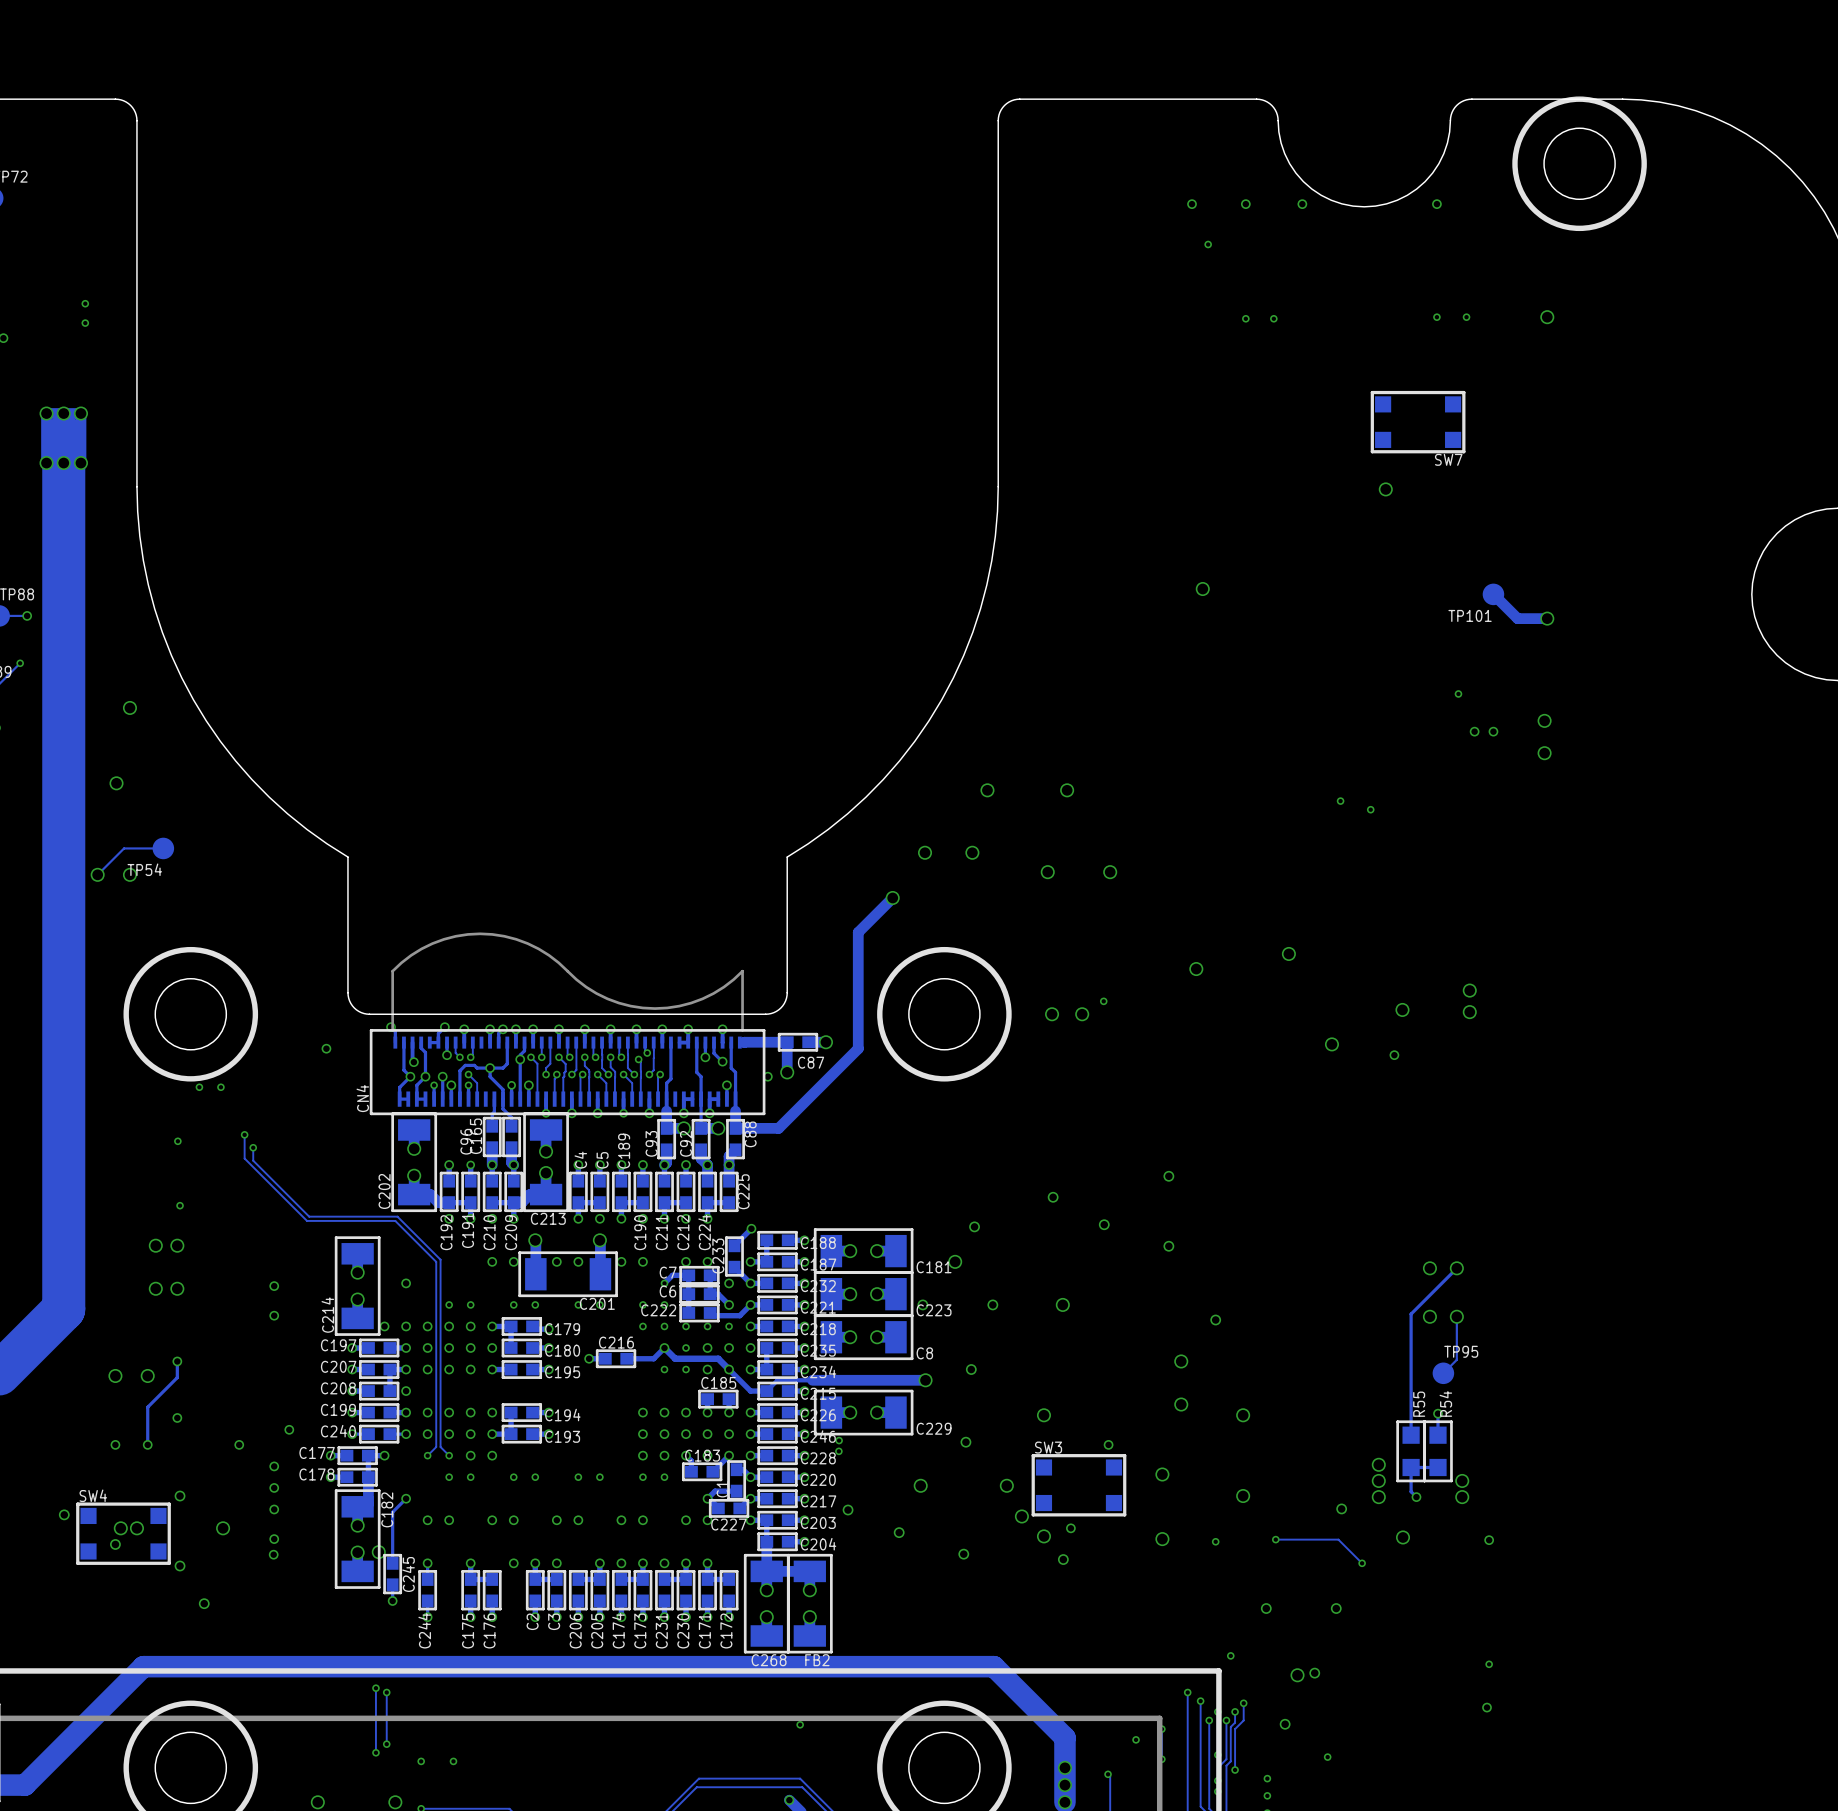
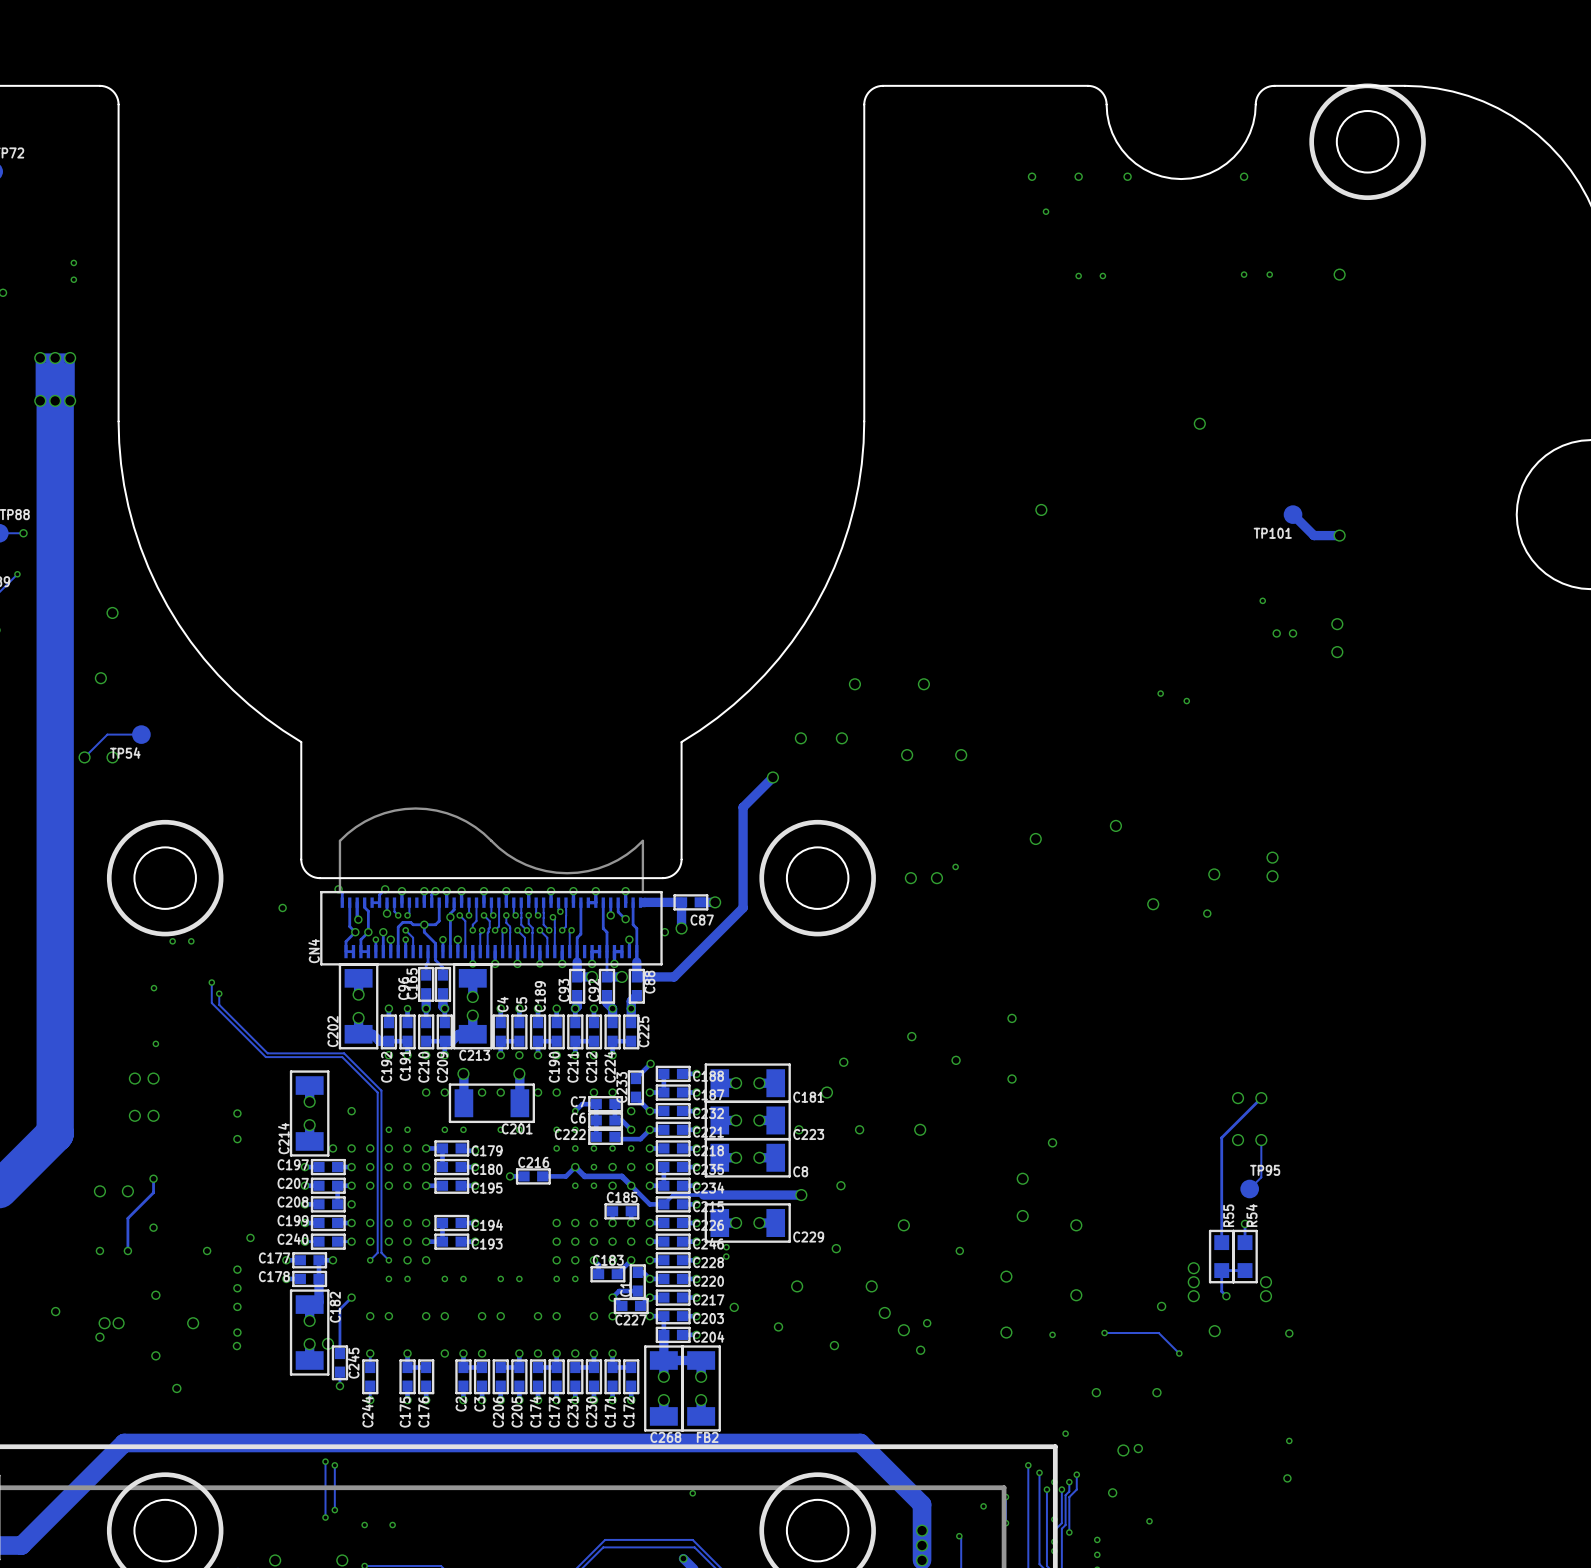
SW7: (1418, 422) -> none
SW3: (1078, 1485) -> none
SW4: (123, 1533) -> none

